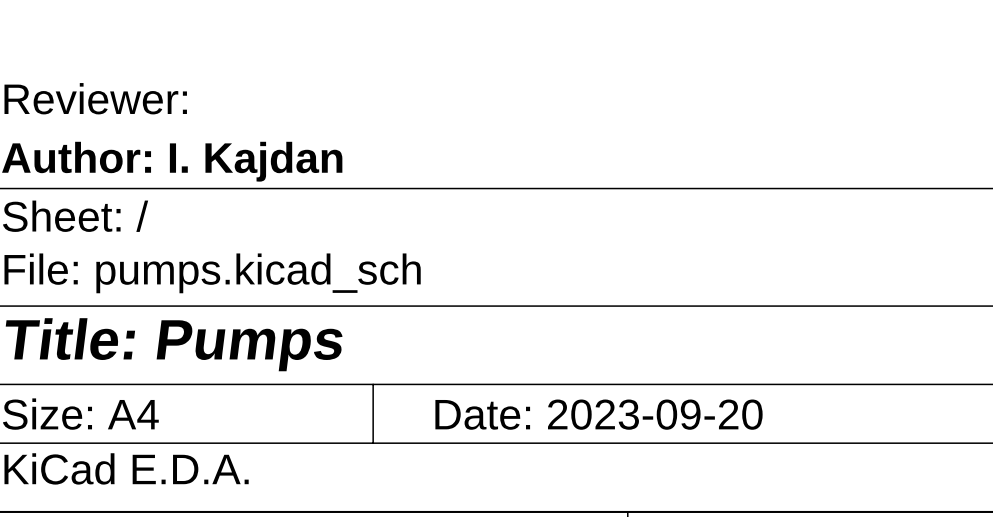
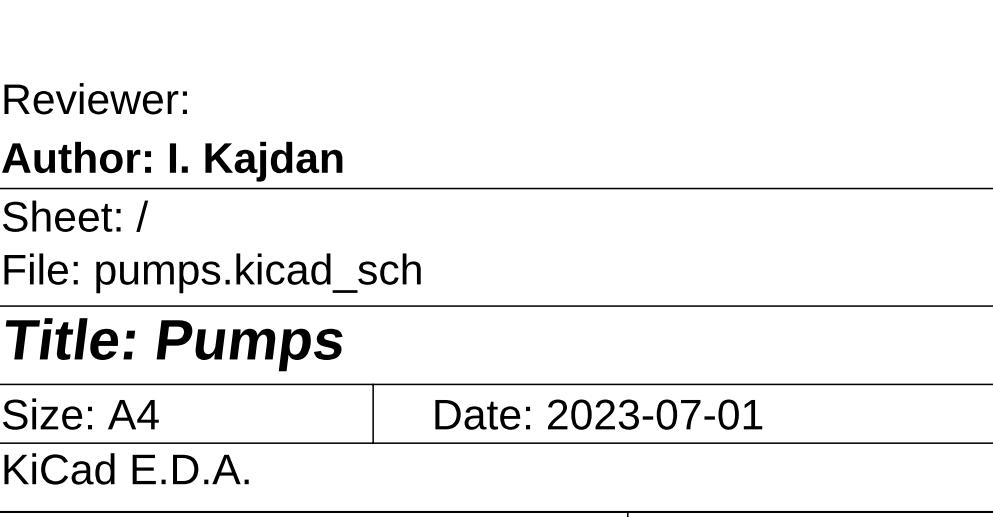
title block: Date: 2023-09-20 (599, 414) -> Date: 2023-07-01 (598, 414)

